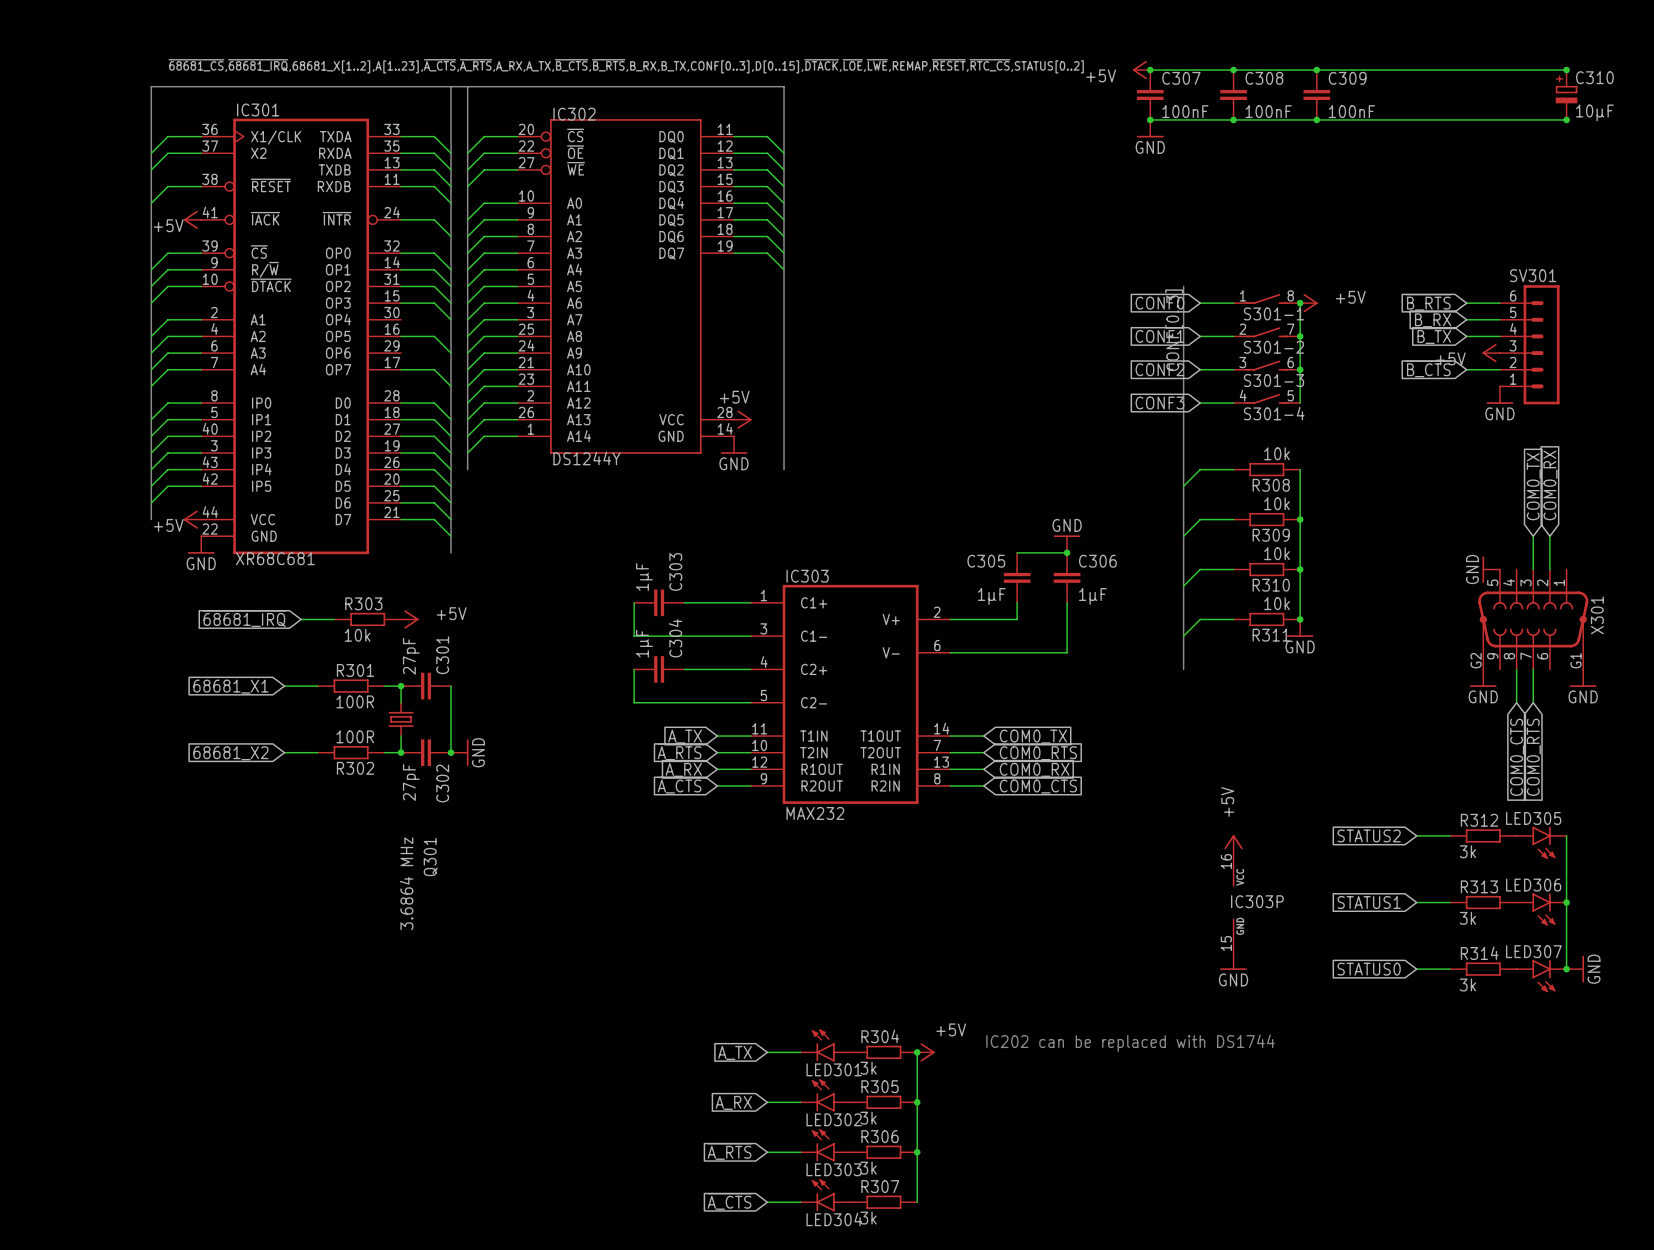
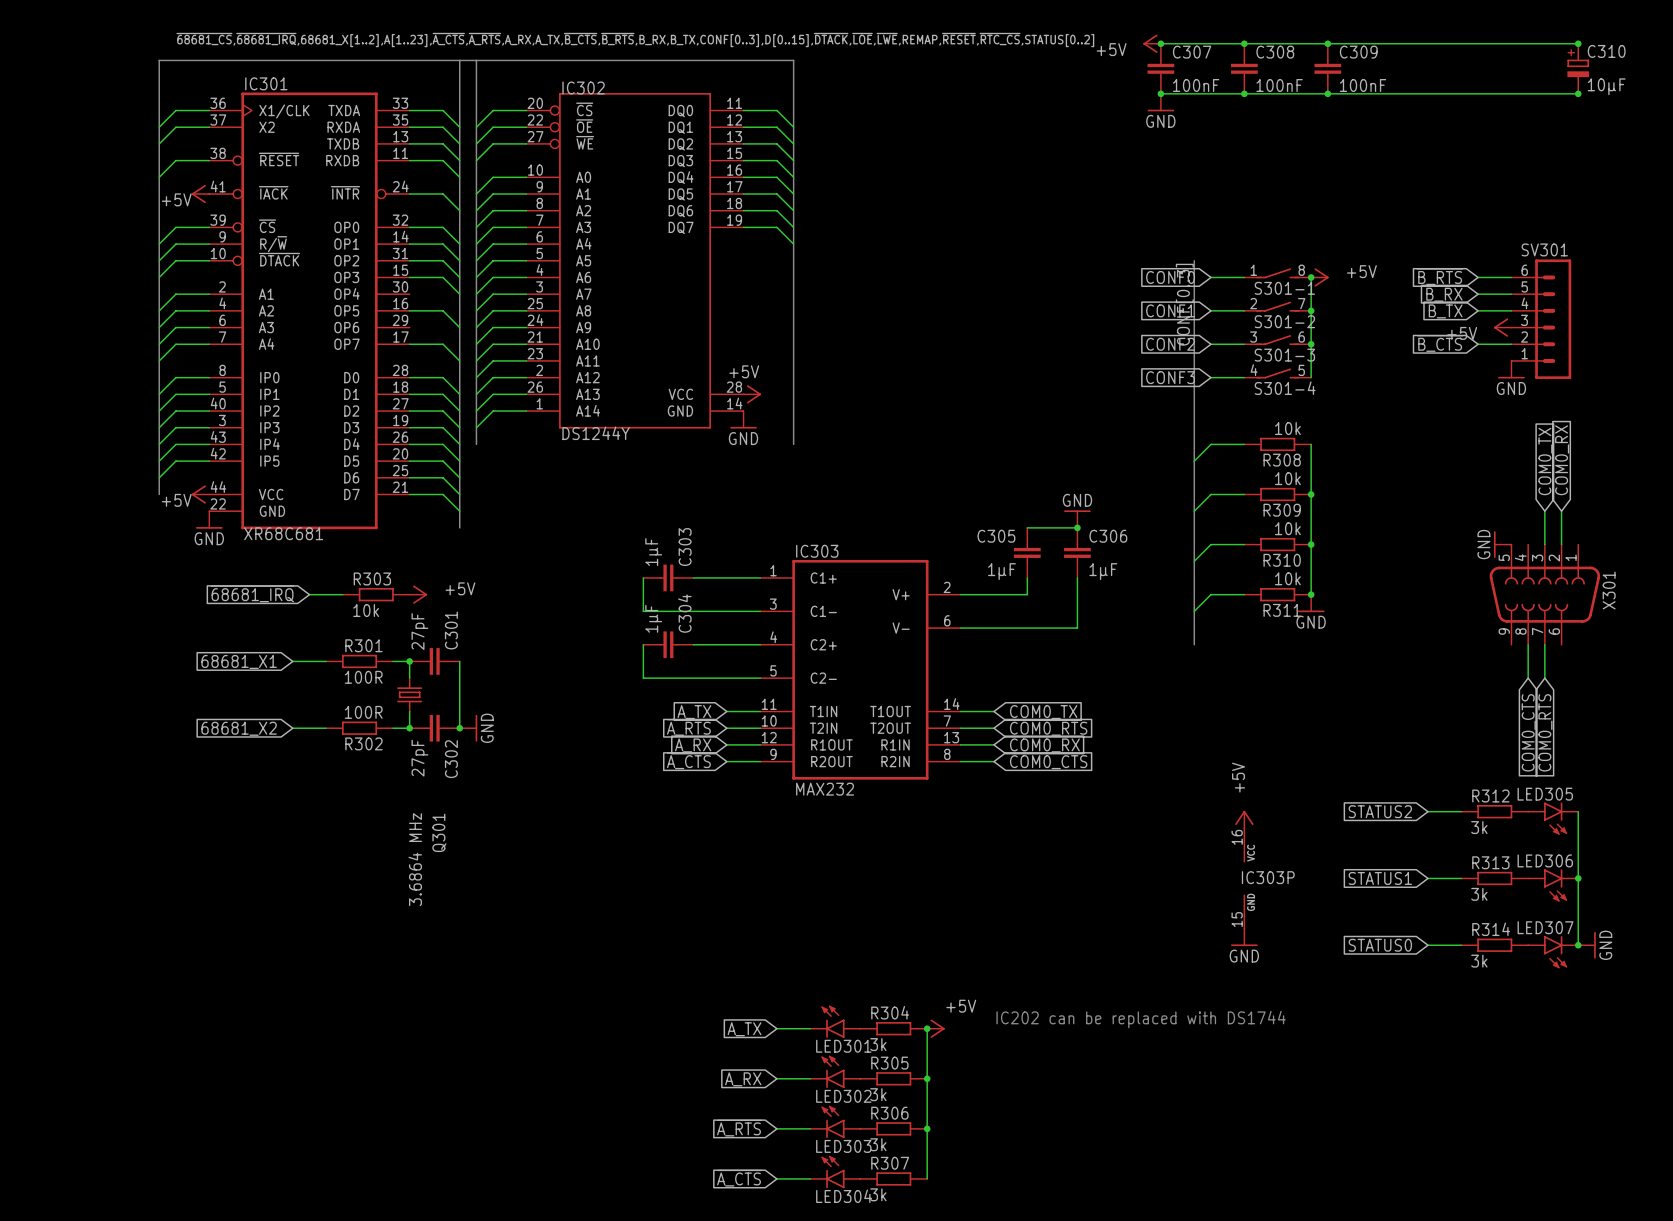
X301 symbol: [1478, 569, 1589, 670] -> [1489, 544, 1601, 645]
power symbol: GND (1483, 678) -> none
power symbol: GND (1583, 678) -> none

